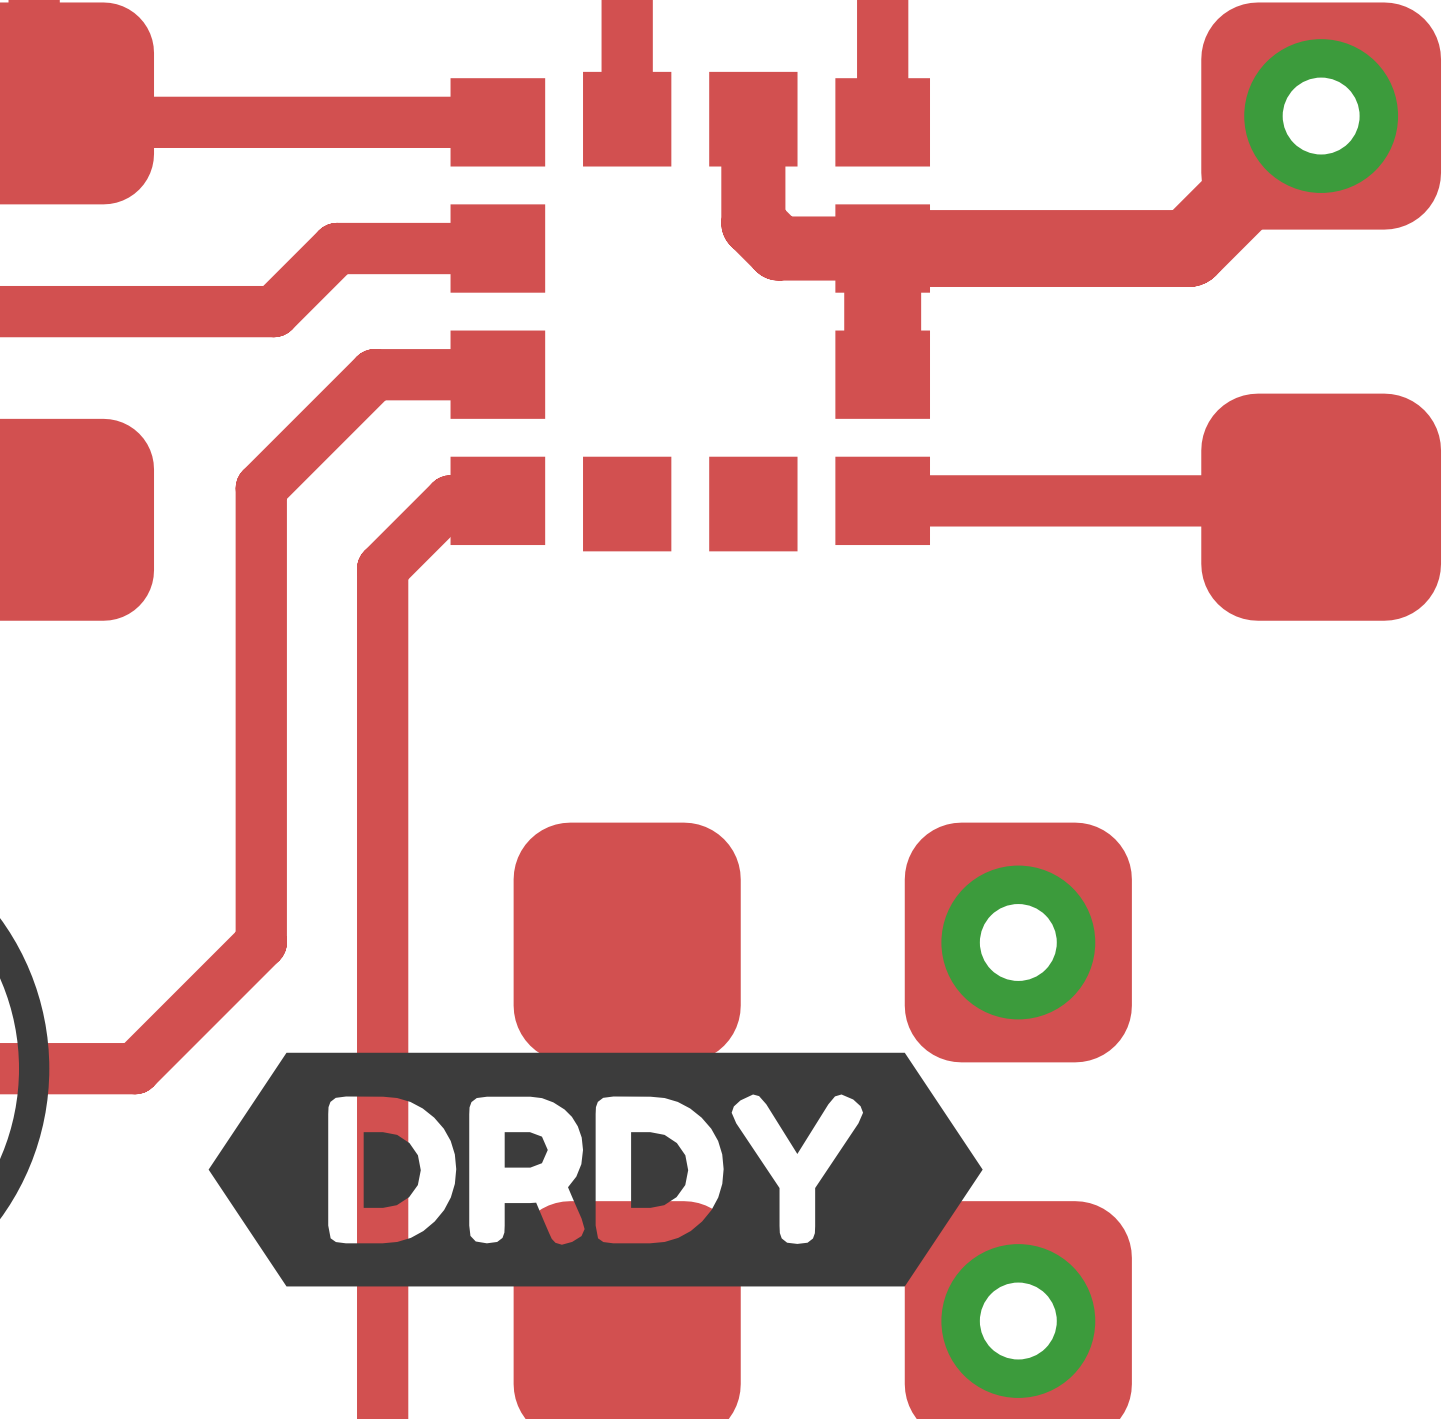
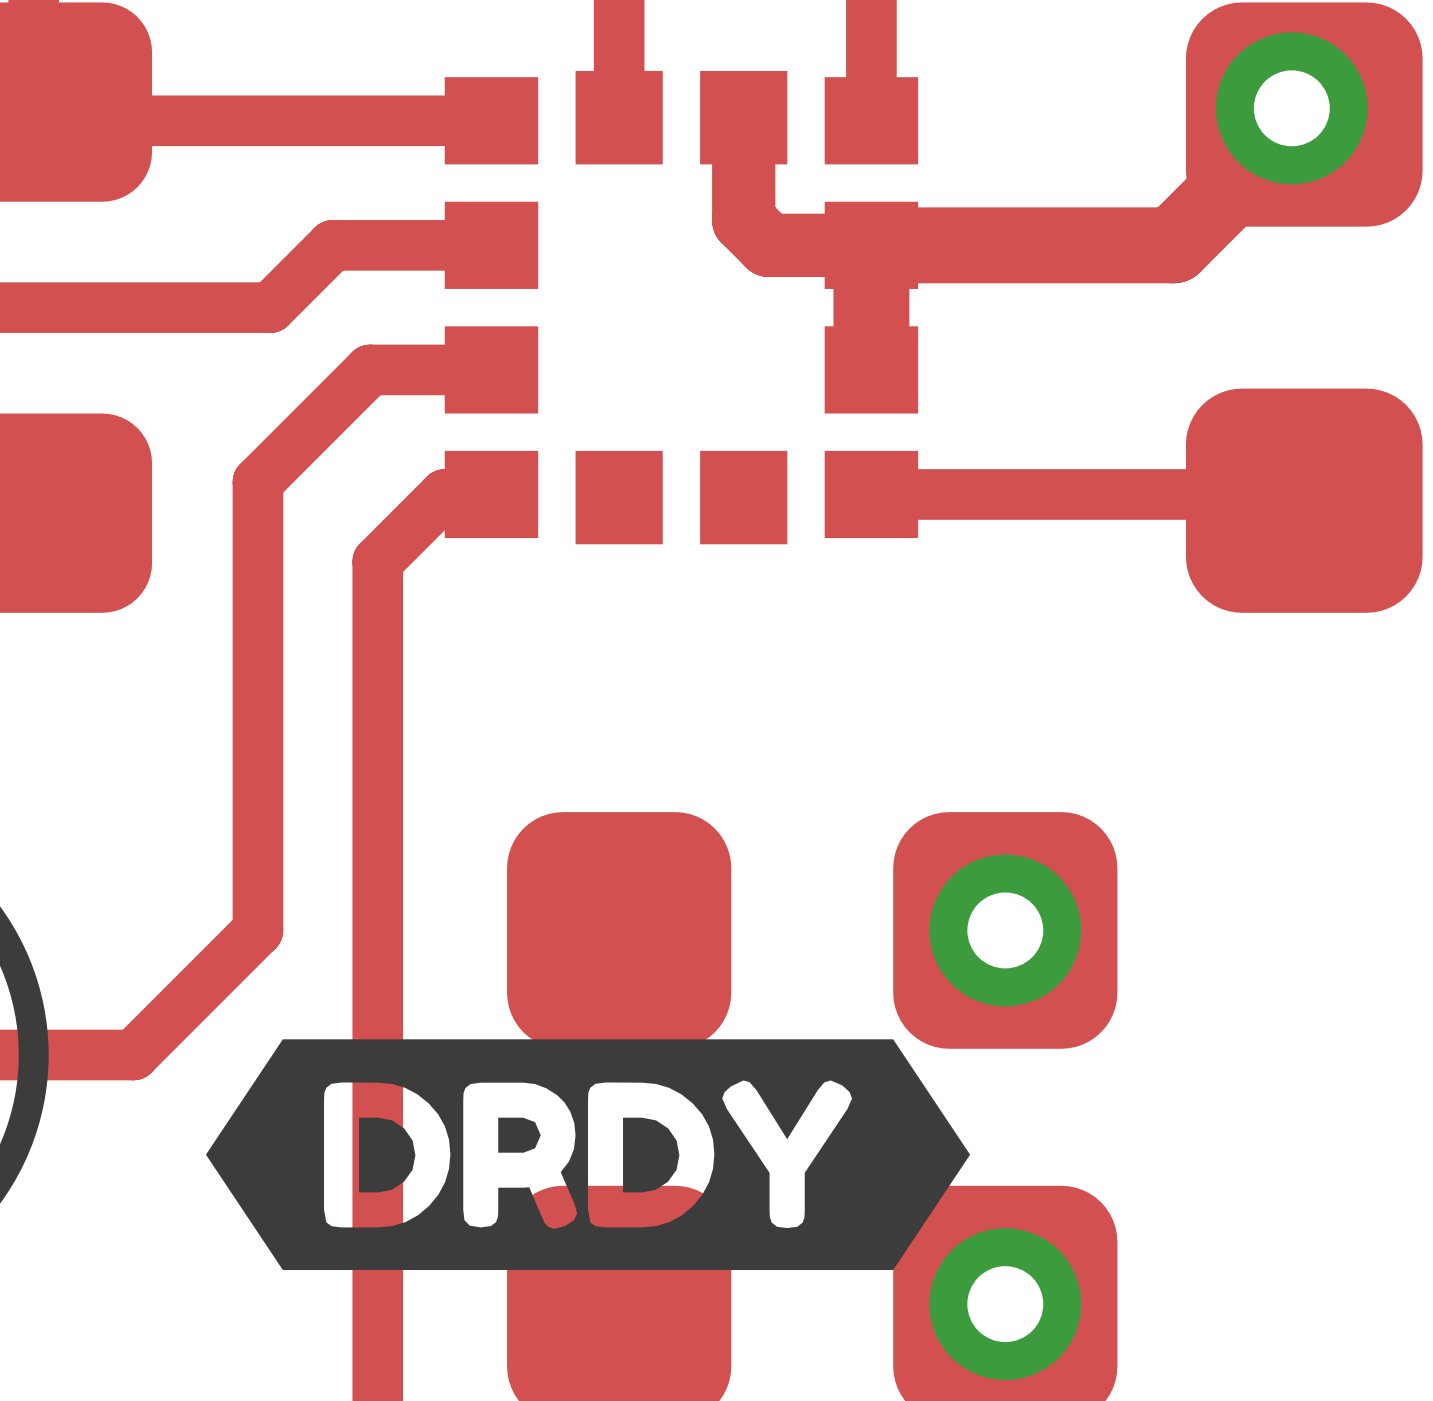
via position: (1321, 116) -> (1291, 108)

